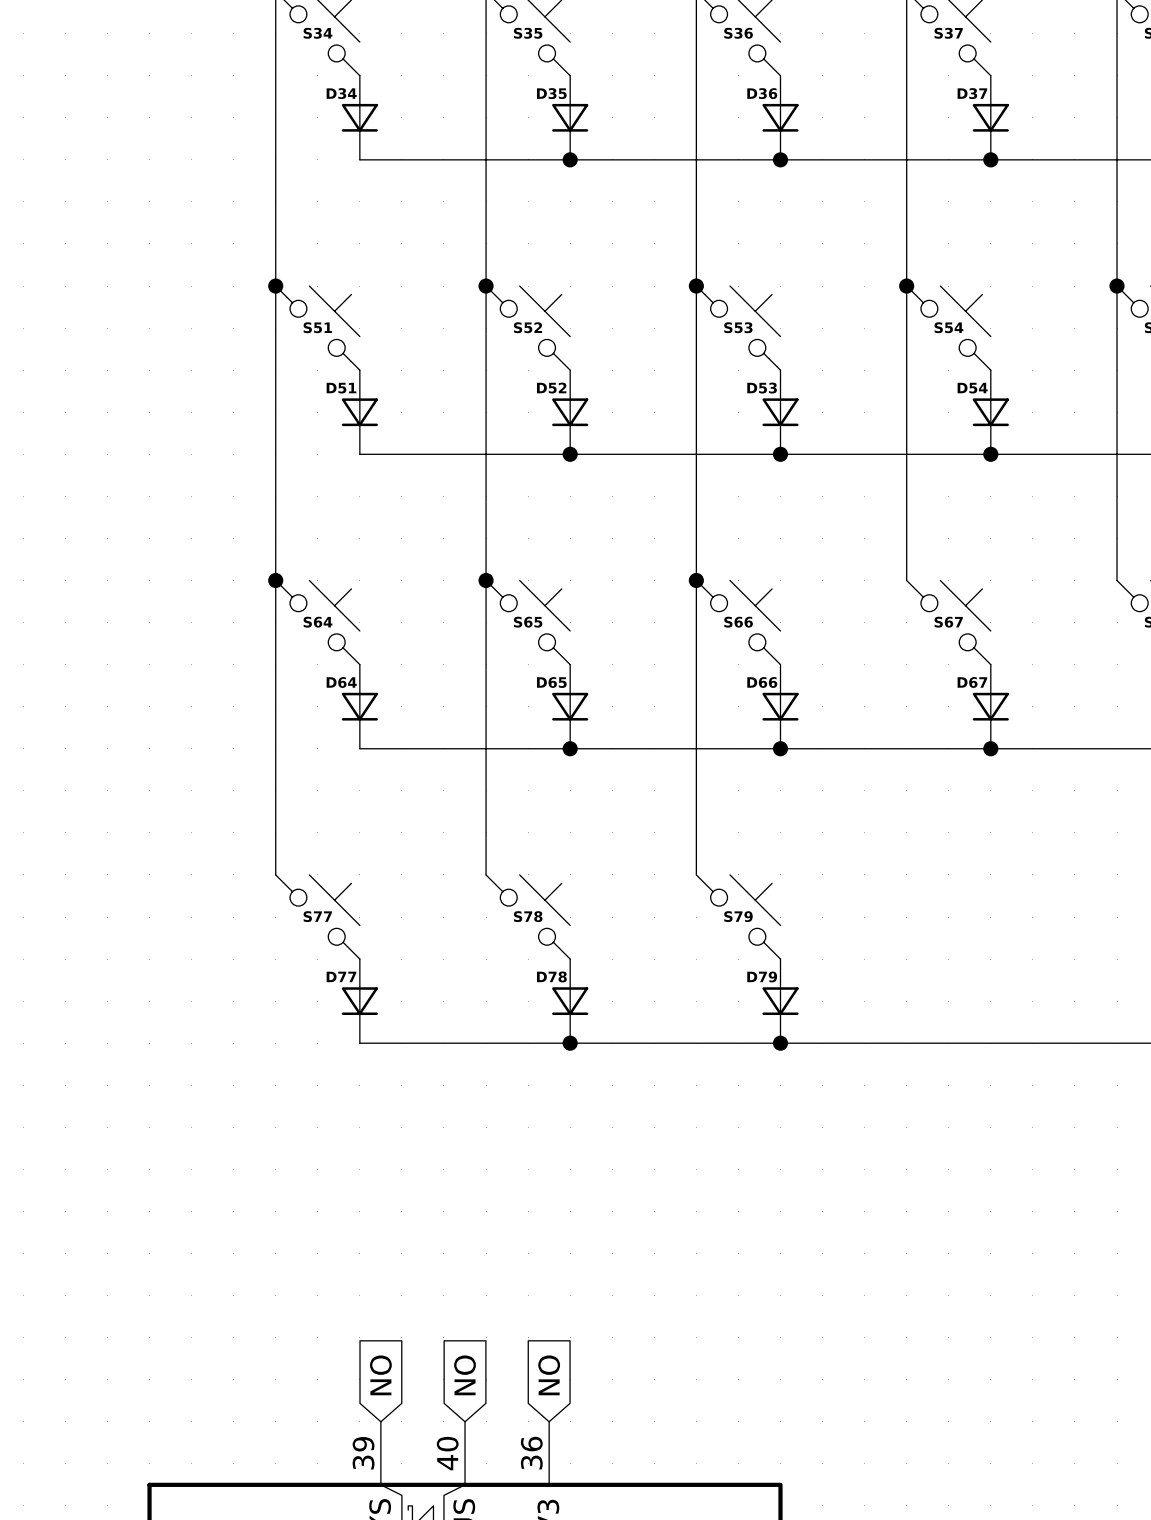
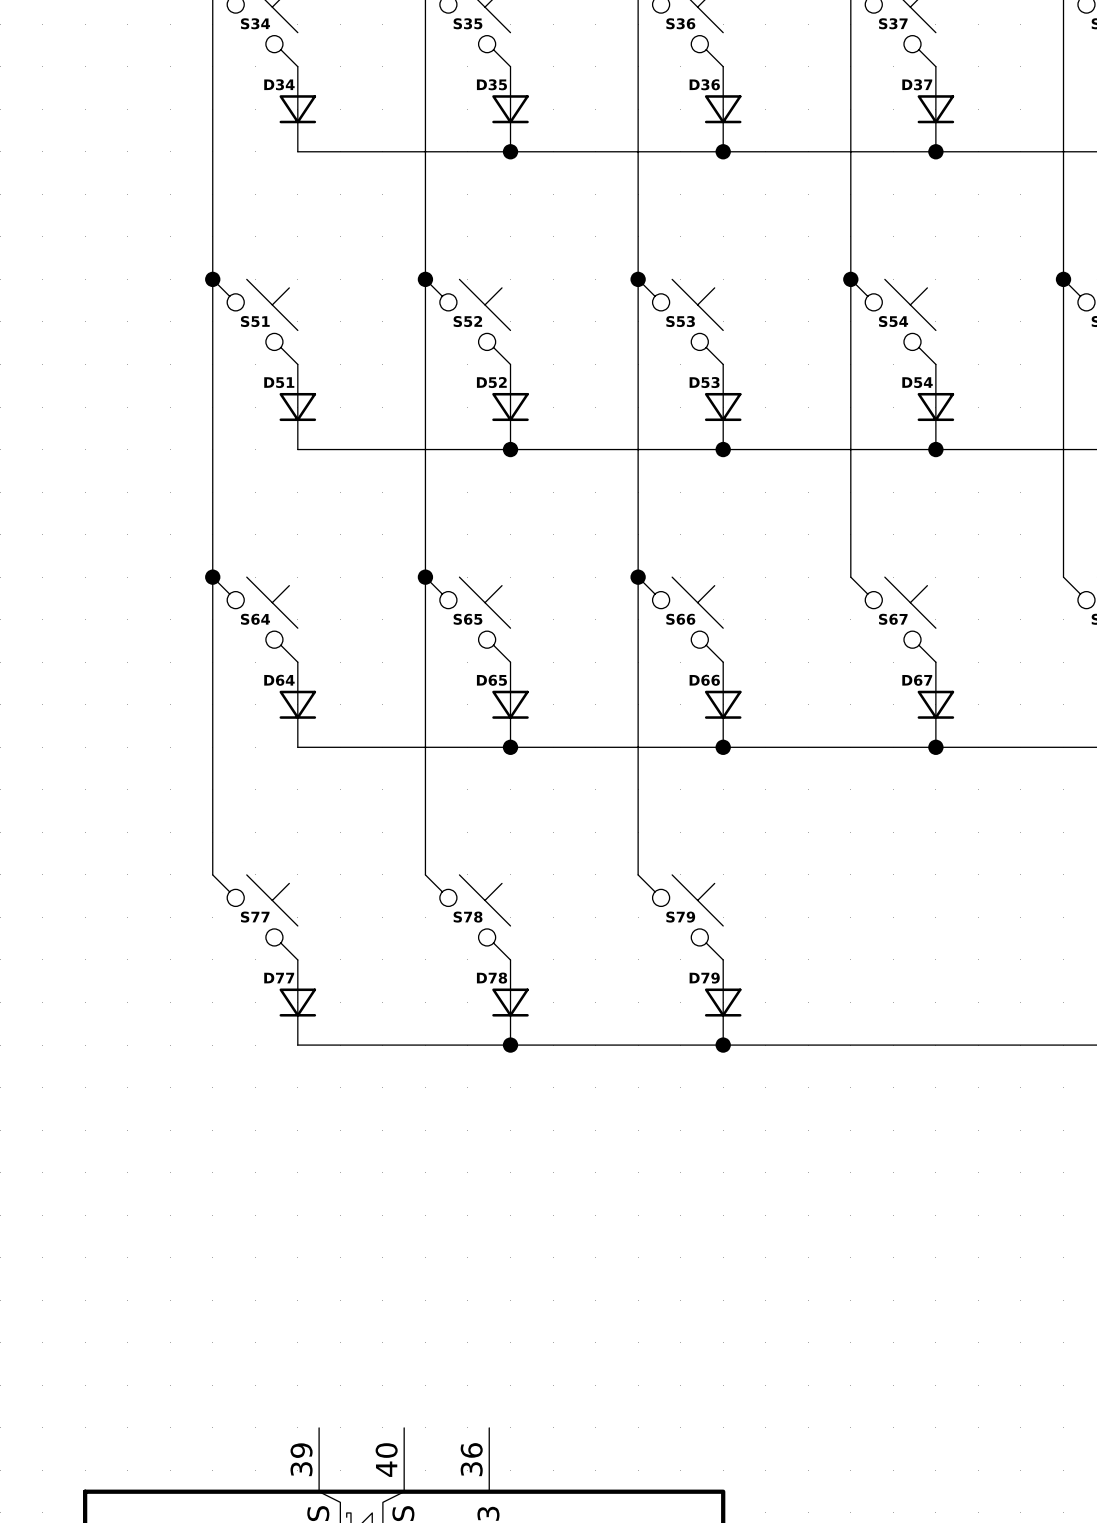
global label: NO (380, 1375) -> none
global label: NO (465, 1375) -> none
global label: NO (549, 1375) -> none

